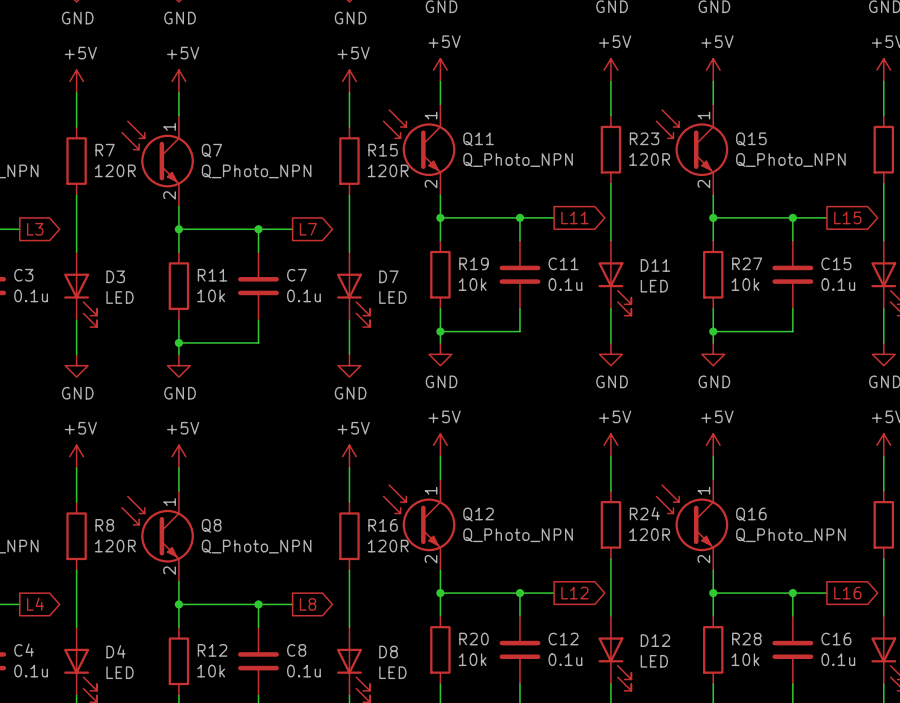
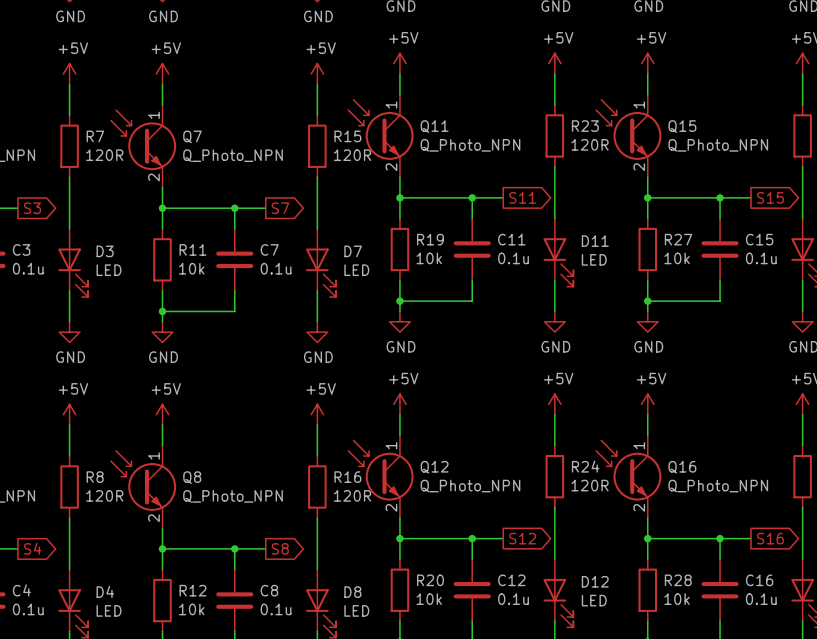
global label: L11 (574, 217) -> S11 (522, 197)
global label: L15 (847, 217) -> S15 (770, 197)
global label: L3 (35, 229) -> S3 (32, 208)
global label: L7 (308, 229) -> S7 (280, 208)
global label: L12 (574, 593) -> S12 (522, 538)
global label: L16 (847, 593) -> S16 (770, 538)
global label: L4 (35, 604) -> S4 (32, 548)
global label: L8 (308, 604) -> S8 (280, 548)

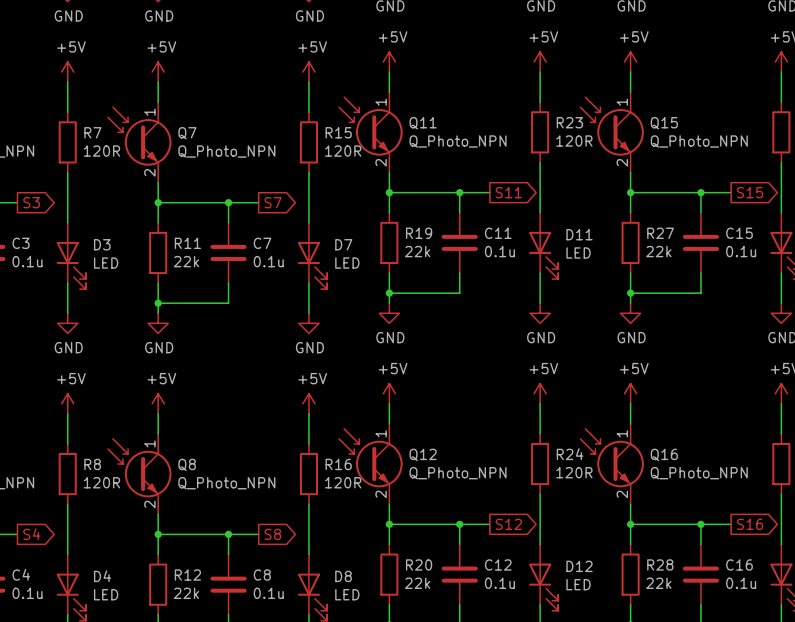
R19 value: 10k (429, 258) -> 22k (417, 251)
R27 value: 10k (677, 258) -> 22k (658, 251)
R11 value: 10k (191, 268) -> 22k (186, 261)
R20 value: 10k (429, 599) -> 22k (417, 583)
R28 value: 10k (677, 599) -> 22k (658, 583)
R12 value: 10k (191, 609) -> 22k (186, 593)

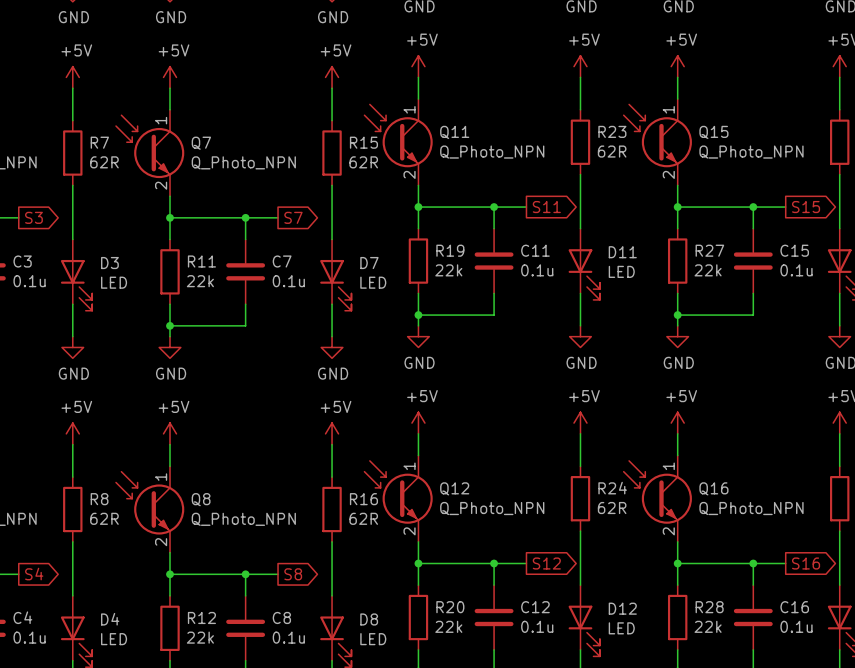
R23 value: 120R (574, 141) -> 62R (612, 151)
R7 value: 120R (101, 151) -> 62R (104, 162)
R15 value: 120R (343, 151) -> 62R (363, 162)
R24 value: 120R (574, 472) -> 62R (612, 508)
R8 value: 120R (101, 482) -> 62R (104, 518)
R16 value: 120R (343, 482) -> 62R (363, 518)

